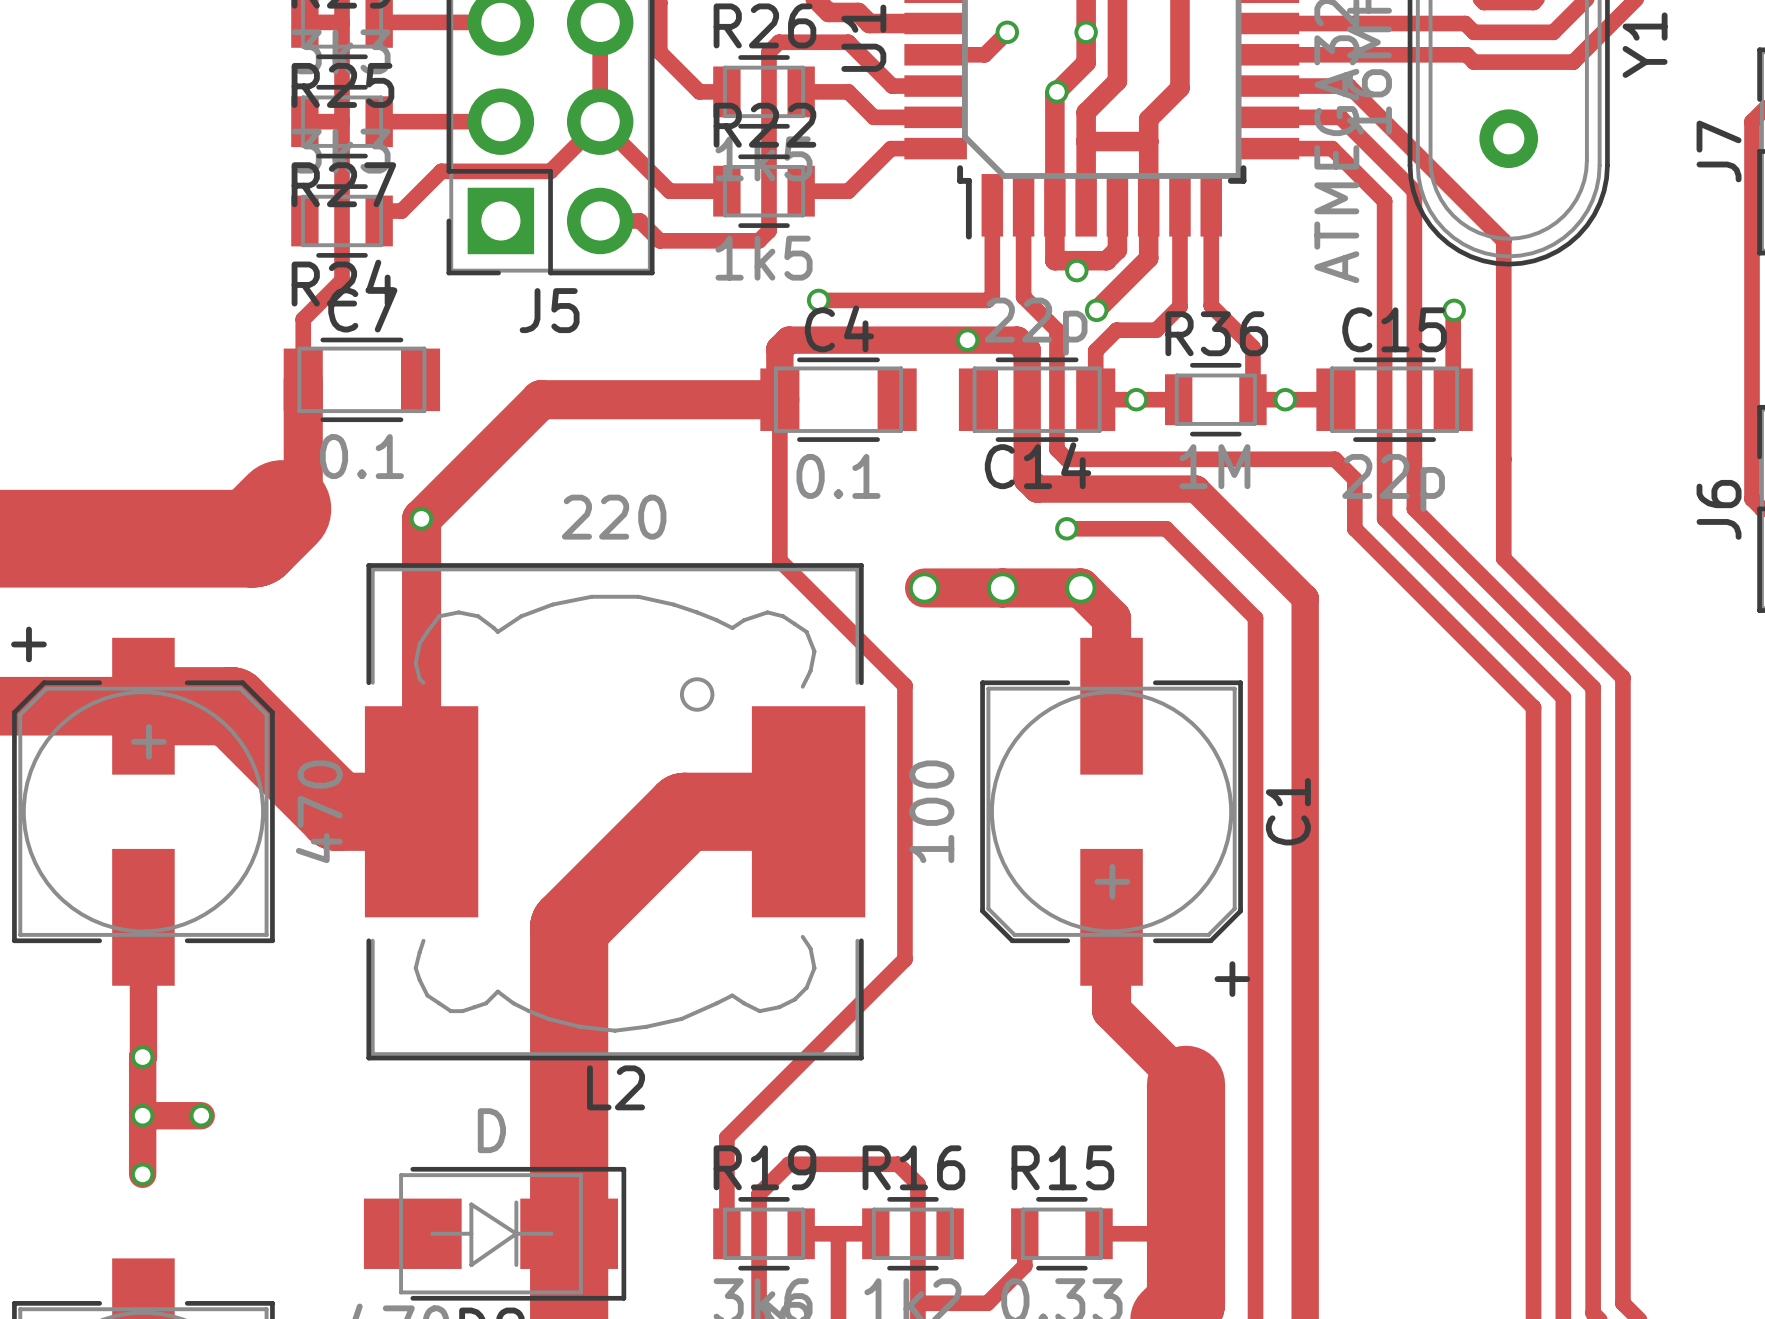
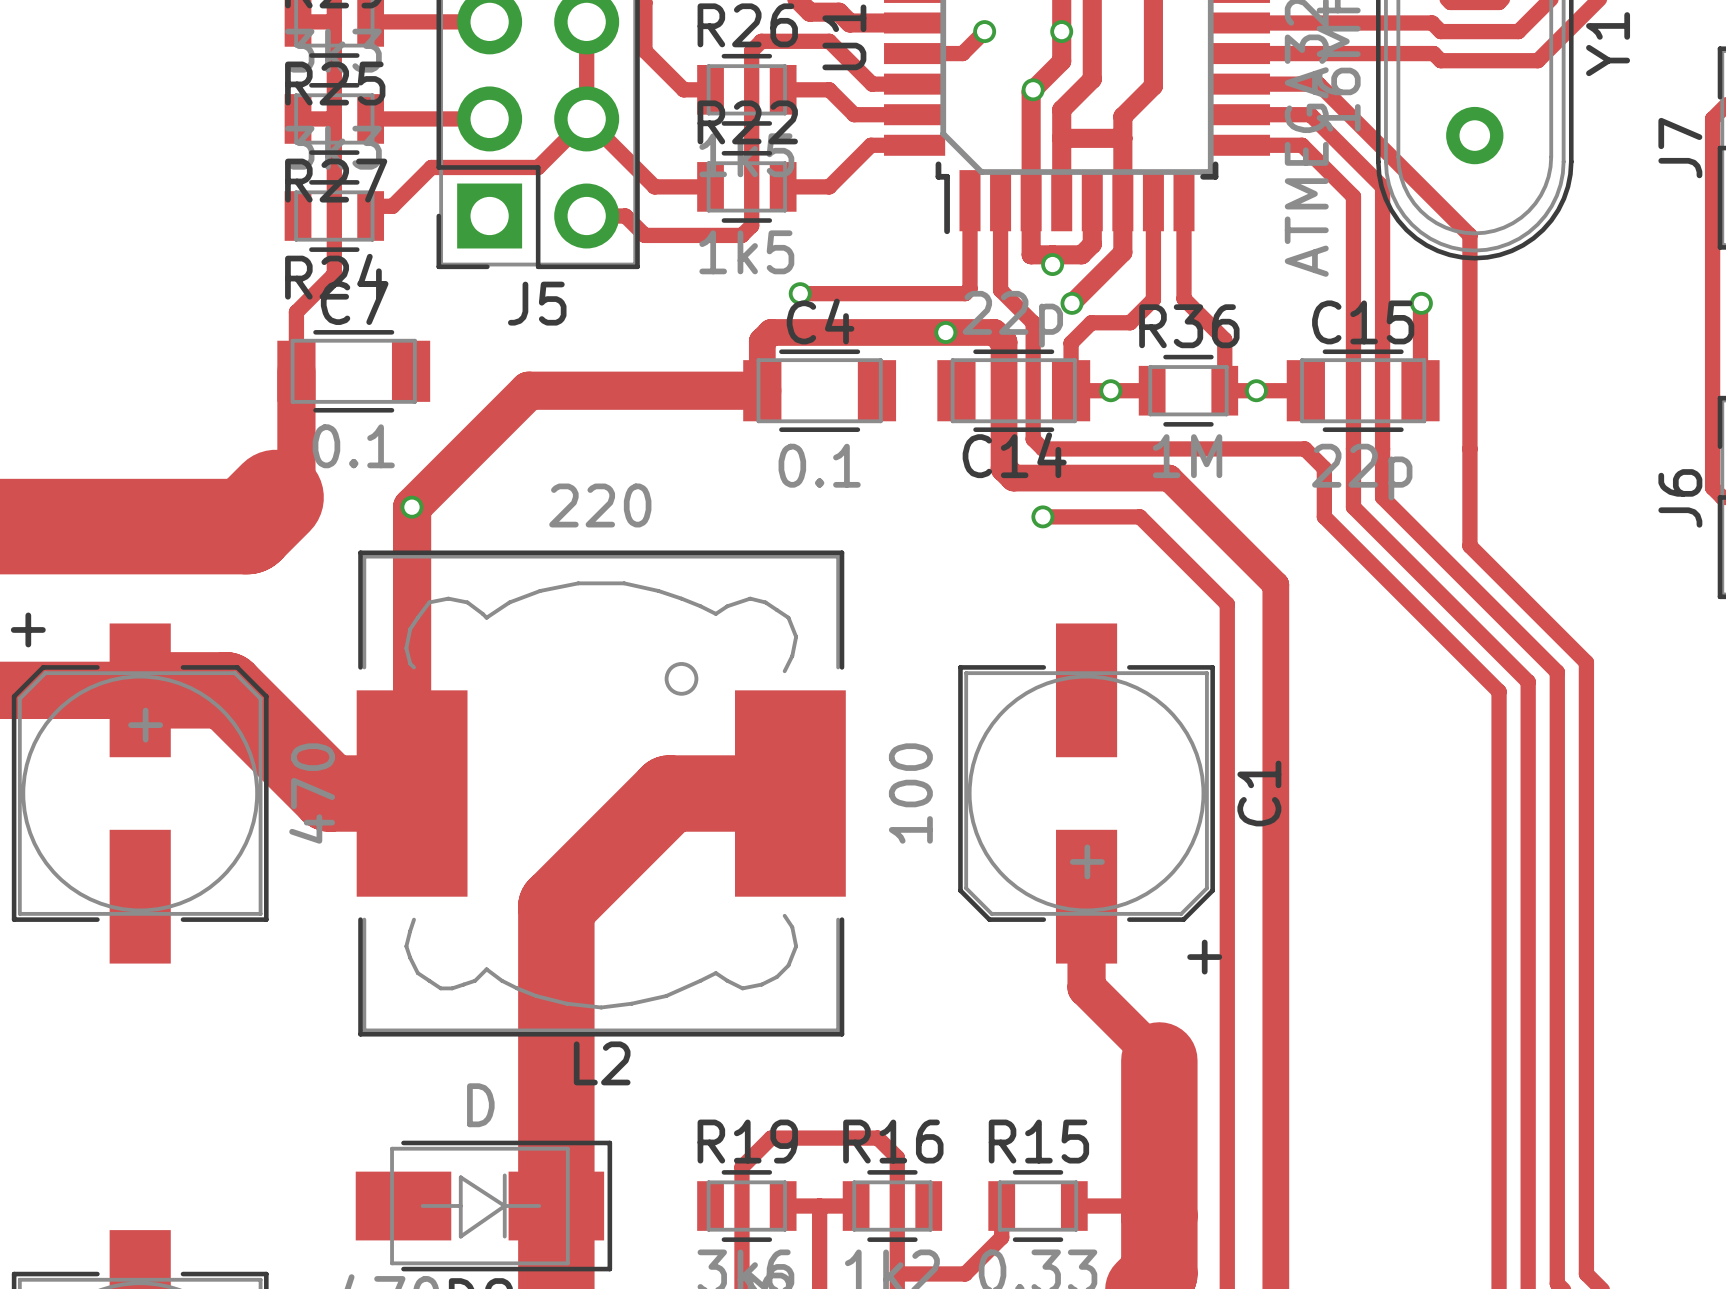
track: (779, 399) (779, 560) (904, 685) (904, 959) (726, 1137) (726, 1233) -> none
track: (924, 587) (1080, 587) (1111, 618) (1111, 706) -> none
via: (924, 587) -> none
via: (1002, 587) -> none
via: (1080, 587) -> none
track: (143, 917) (142, 1174) -> none
via: (142, 1057) -> none
track: (142, 1115) (201, 1115) -> none
via: (142, 1115) -> none
via: (201, 1115) -> none
via: (142, 1174) -> none

